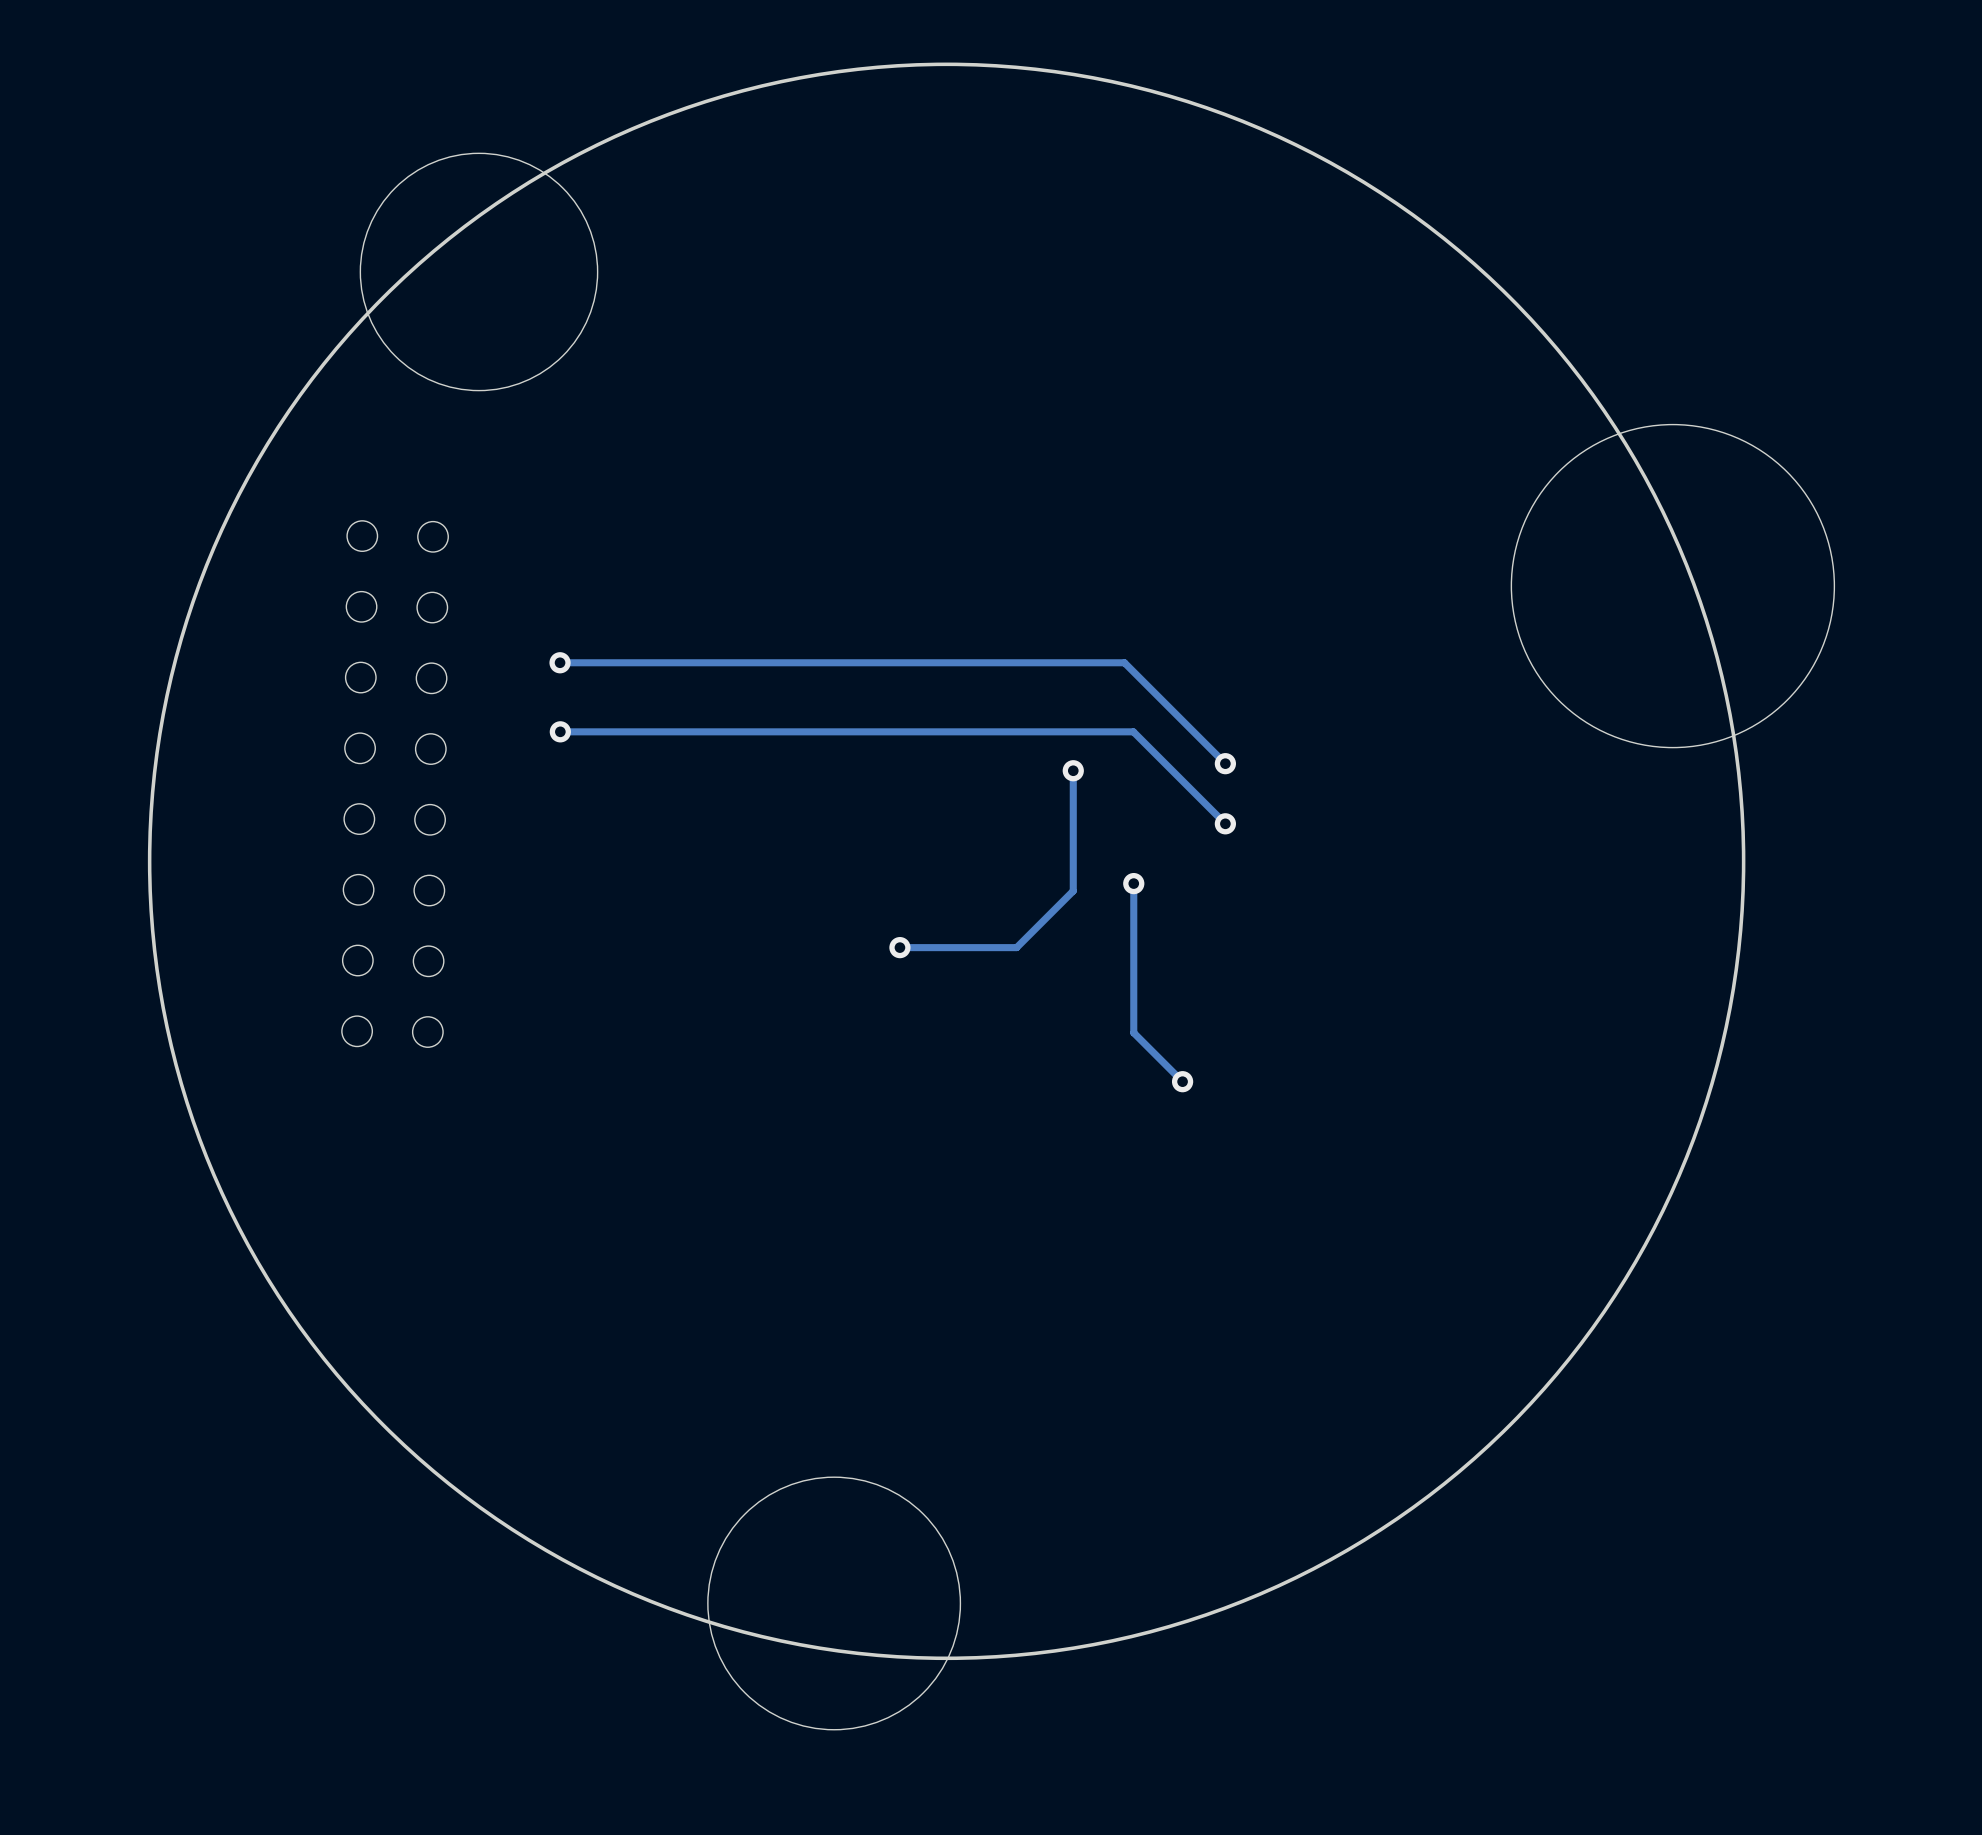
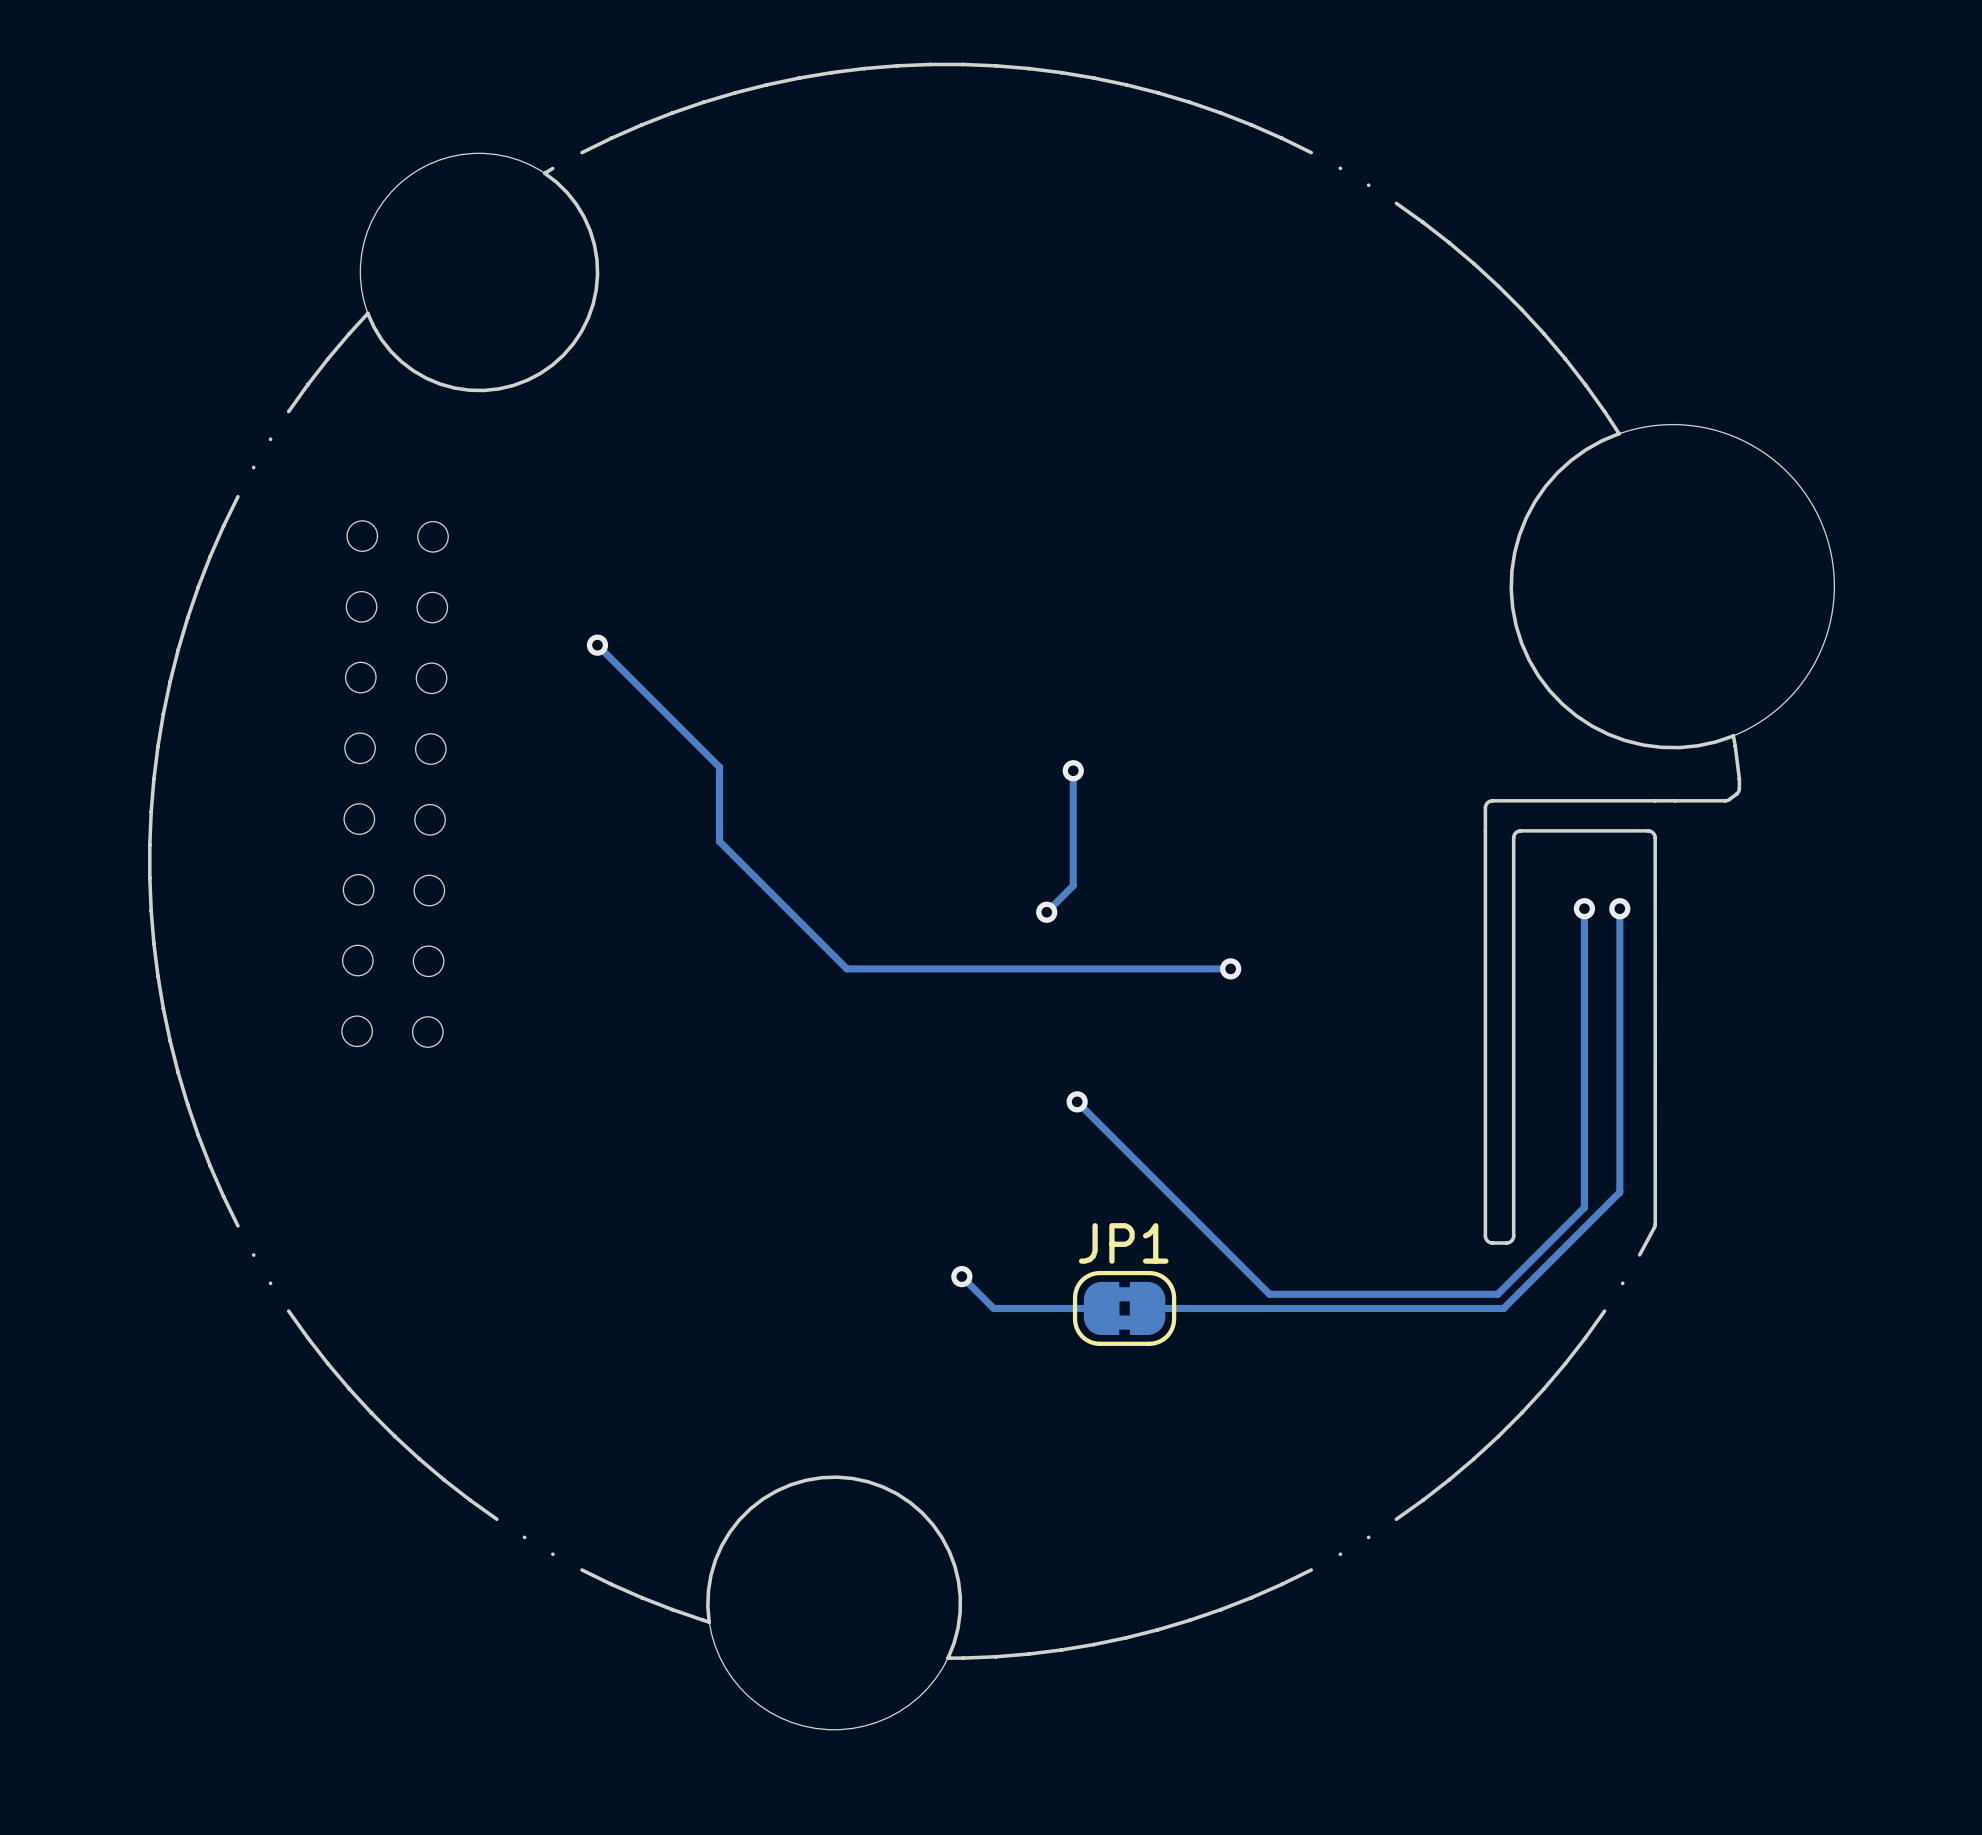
round board edge: [147, 62, 1746, 1661] -> none
board edge: none -> (734, 92) (672, 113) (582, 152)
board edge: none -> (1158, 92) (1061, 72) (962, 64) (864, 68) (799, 78) (735, 92)
board edge: none -> (1158, 92) (1221, 113) (1311, 152)
board edge: none -> (552, 168) (544, 173) (556, 182) (576, 204) (590, 230) (596, 259) (597, 274) (593, 303) (581, 331) (563, 355) (540, 373) (513, 385) (483, 390) (454, 387) (426, 378) (401, 361) (381, 339) (367, 313) (327, 358) (288, 411)
board edge: none -> (1340, 168) (1340, 168)
board edge: none -> (1368, 185) (1368, 185)
board edge: none -> (1396, 203) (1449, 242) (1521, 309) (1565, 358) (1604, 411)
board edge: none -> (1604, 411) (1619, 433) (1586, 449) (1557, 472) (1534, 501) (1519, 535) (1511, 570) (1511, 589) (1516, 625) (1521, 643) (1538, 675) (1562, 703) (1576, 715) (1608, 734) (1625, 740) (1661, 747) (1698, 745) (1733, 735)
board edge: none -> (270, 439) (270, 439)
board edge: none -> (253, 467) (253, 467)
board edge: none -> (237, 496) (198, 586) (178, 649)
track: none -> (597, 645) (719, 767) (719, 841) (846, 968) (1230, 968)
board edge: none -> (178, 649) (157, 746) (149, 844) (153, 943) (163, 1008) (178, 1072)
track: (560, 662) (1124, 662) (1225, 763) -> none
via position: (560, 662) -> (597, 645)
track: (560, 731) (1133, 731) (1225, 823) -> none
via: (560, 731) -> none
board edge: none -> (1733, 735) (1739, 789) (1737, 793) (1727, 800) (1492, 800) (1488, 802) (1485, 806) (1485, 1235) (1487, 1240) (1491, 1242) (1508, 1242) (1513, 1235) (1514, 835) (1520, 830) (1648, 830) (1654, 835) (1655, 1224) (1639, 1254)
via: (1225, 763) -> none
via: (1225, 823) -> none
track: (1133, 883) (1133, 1032) (1182, 1081) -> none
via: (1133, 883) -> none
track: (1073, 885) (1073, 891) (1016, 947) (899, 947) -> (1073, 885) (1046, 912)
track: none -> (1584, 908) (1584, 1207) (1497, 1294) (1269, 1294) (1077, 1101)
via: none -> (1584, 908)
track: none -> (1619, 908) (1619, 1192) (1503, 1308) (1147, 1308)
via: none -> (1619, 908)
via: none -> (1046, 912)
via: (899, 947) -> none
via: none -> (1230, 968)
board edge: none -> (178, 1073) (198, 1135) (237, 1225)
via: (1182, 1081) -> none
via: none -> (1077, 1101)
board edge: none -> (253, 1254) (253, 1255)
track: none -> (961, 1276) (993, 1308) (1101, 1308)
via: none -> (961, 1276)
board edge: none -> (270, 1283) (270, 1283)
board edge: none -> (1622, 1283) (1622, 1283)
JP1: none -> (1124, 1308)
board edge: none -> (288, 1311) (327, 1363) (371, 1413) (444, 1479) (496, 1519)
board edge: none -> (1604, 1311) (1565, 1363) (1521, 1413) (1449, 1479) (1396, 1519)
board edge: none -> (524, 1537) (524, 1537)
board edge: none -> (1368, 1537) (1368, 1537)
board edge: none -> (552, 1554) (553, 1554)
board edge: none -> (1340, 1554) (1340, 1554)
board edge: none -> (582, 1569) (641, 1597) (709, 1622) (707, 1606) (710, 1575) (721, 1545) (739, 1519) (762, 1499) (790, 1484) (821, 1477) (852, 1478) (883, 1487) (910, 1502) (932, 1524) (941, 1537) (954, 1566) (960, 1597) (958, 1628) (948, 1658) (996, 1656) (1061, 1649) (1158, 1629)
board edge: none -> (1311, 1569) (1221, 1609) (1158, 1629)

